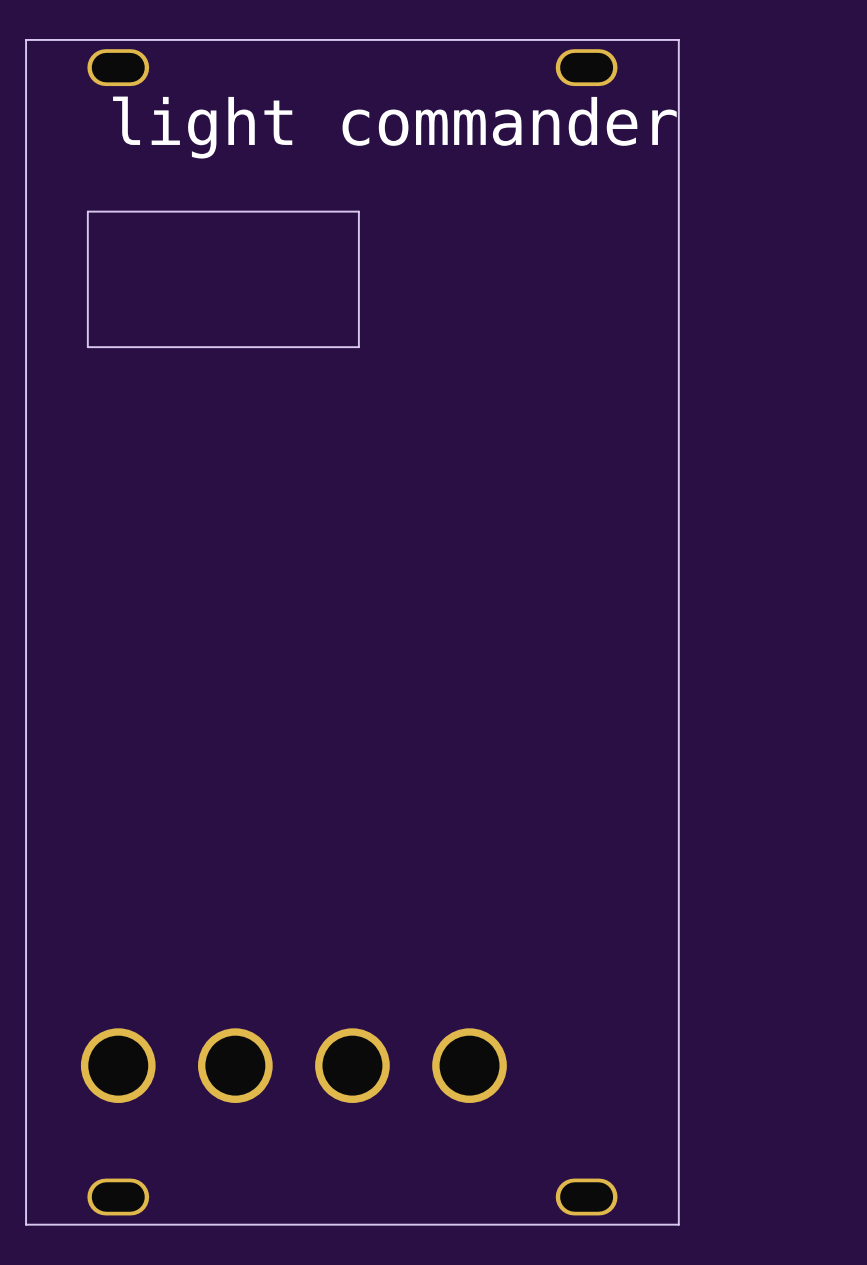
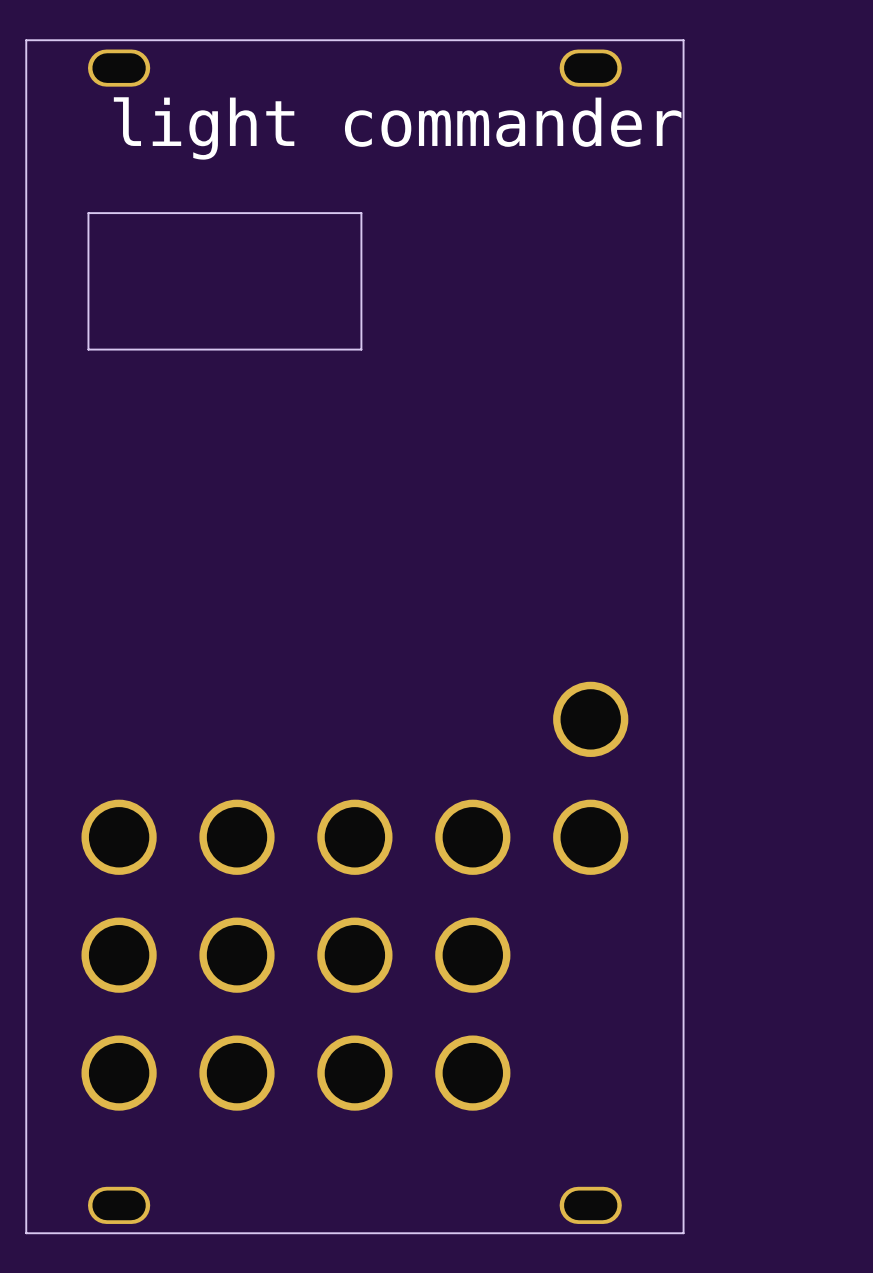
part: none -> (590, 719)
part: none -> (119, 837)
part: none -> (237, 837)
part: none -> (354, 837)
part: none -> (472, 837)
part: none -> (590, 837)
part: none -> (119, 955)
part: none -> (237, 955)
part: none -> (354, 955)
part: none -> (472, 955)

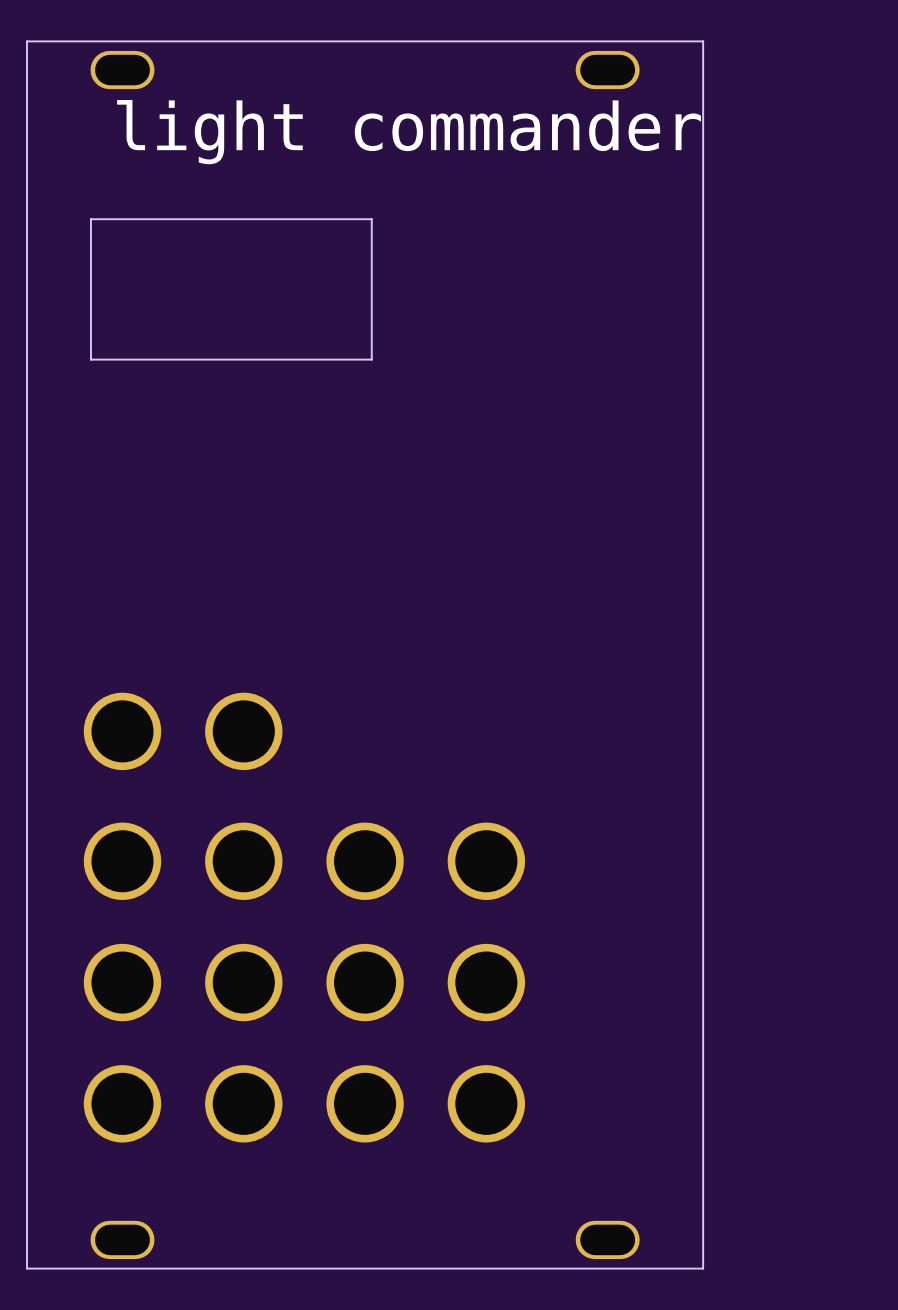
part: none -> (122, 731)
part: none -> (243, 731)
part: (590, 719) -> none
part: (590, 837) -> none

